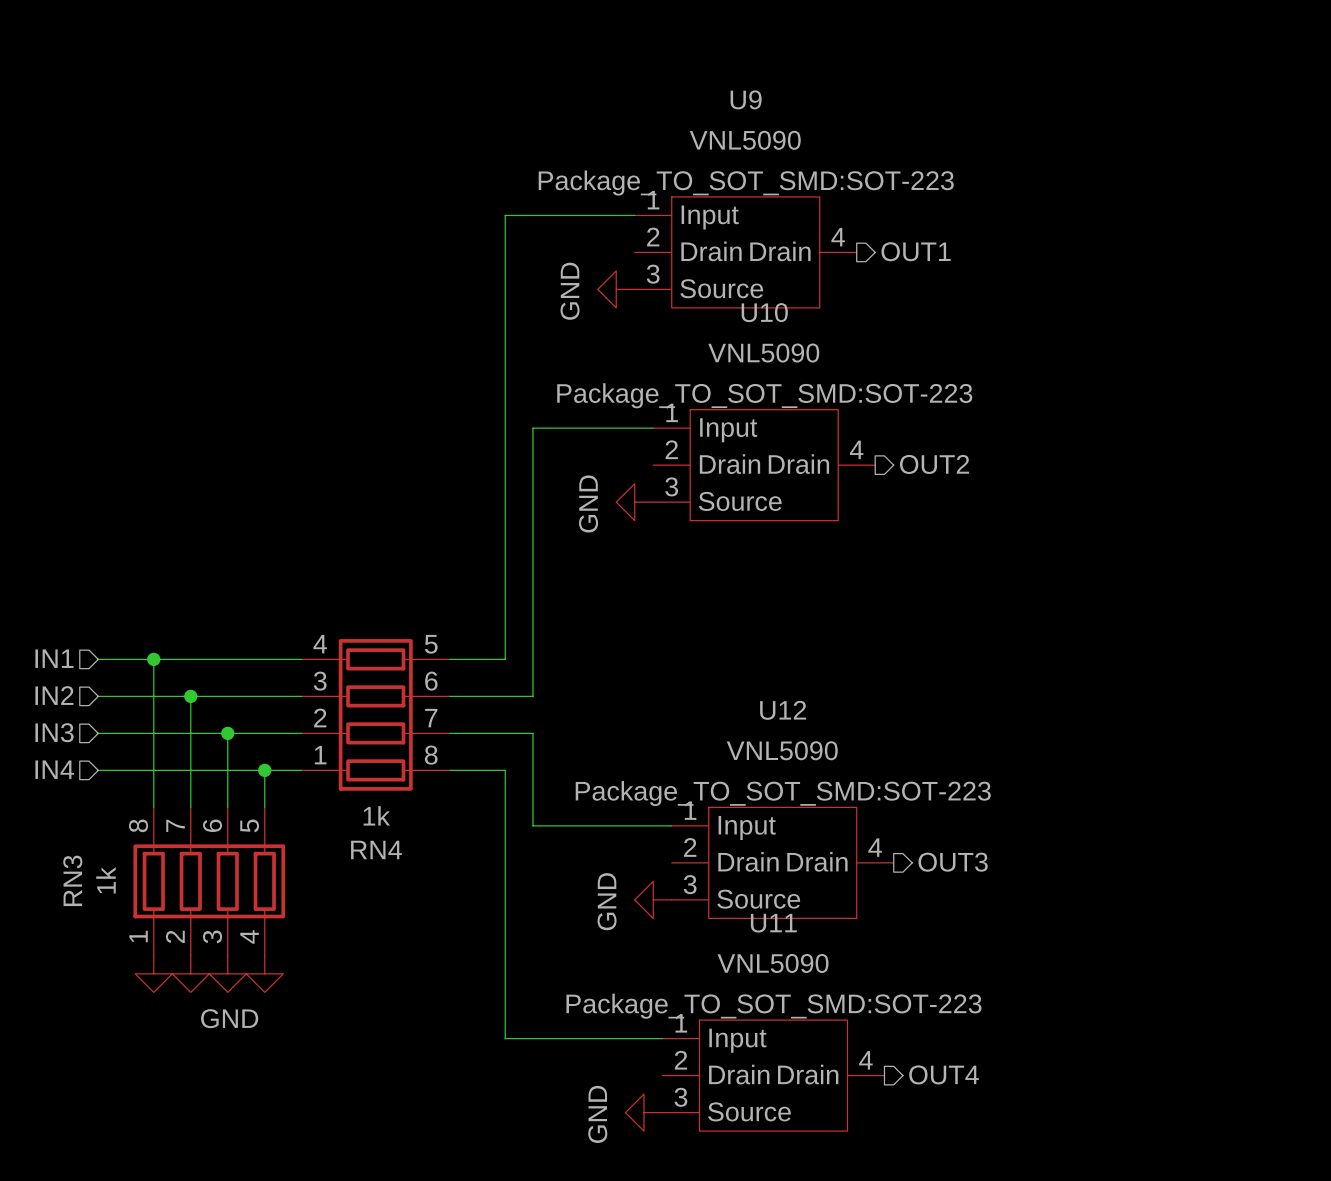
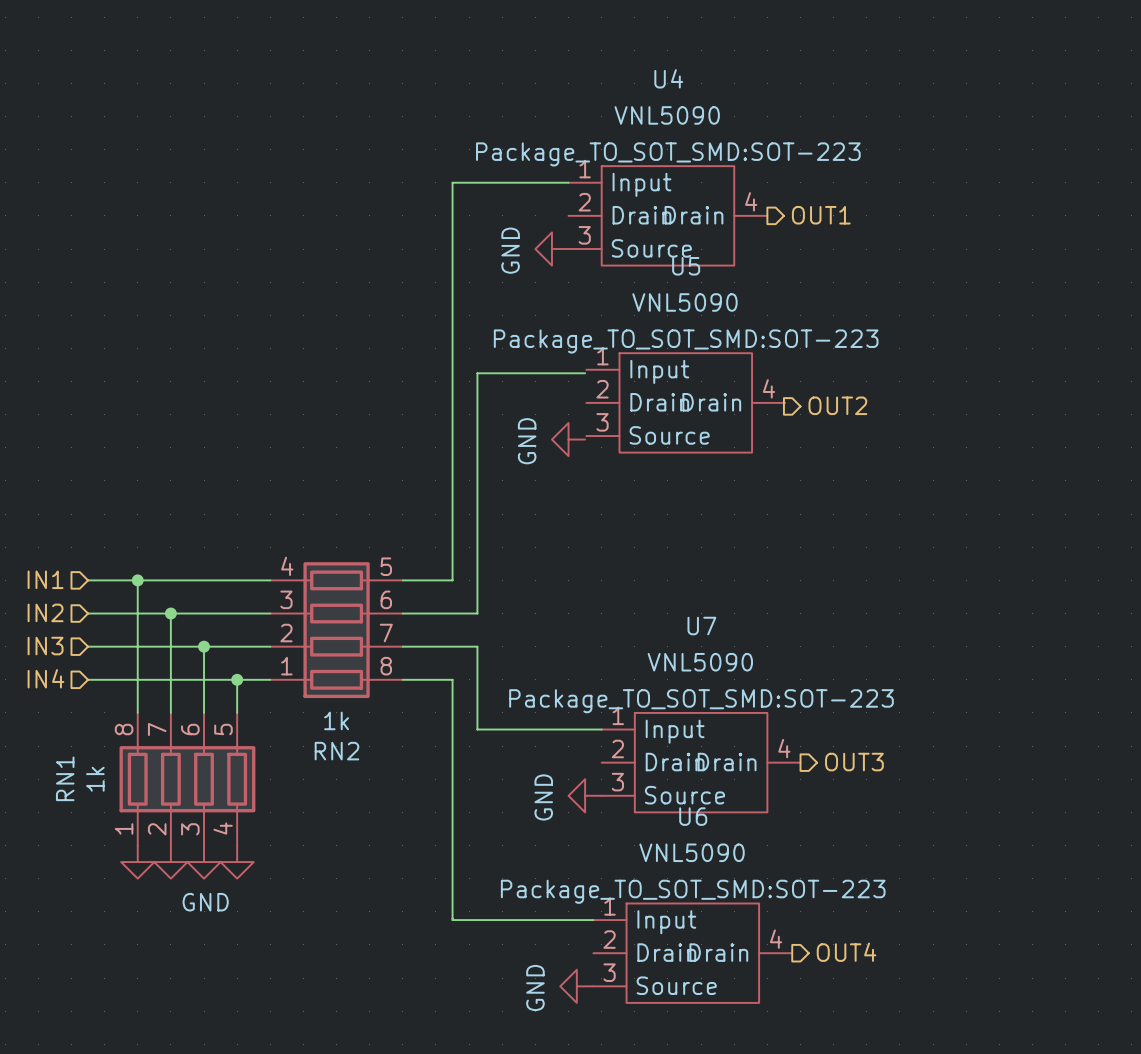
U9 name: U9 (746, 99) -> U4 (668, 78)
U5: none -> VNL5090 (685, 402)
U10: VNL5090 (764, 465) -> none
U12 name: U12 (783, 710) -> U7 (701, 626)
RN4 name: RN4 (376, 849) -> RN2 (336, 751)
RN3 name: RN3 (72, 880) -> RN1 (65, 778)
U11 name: U11 (773, 923) -> U6 (693, 816)

